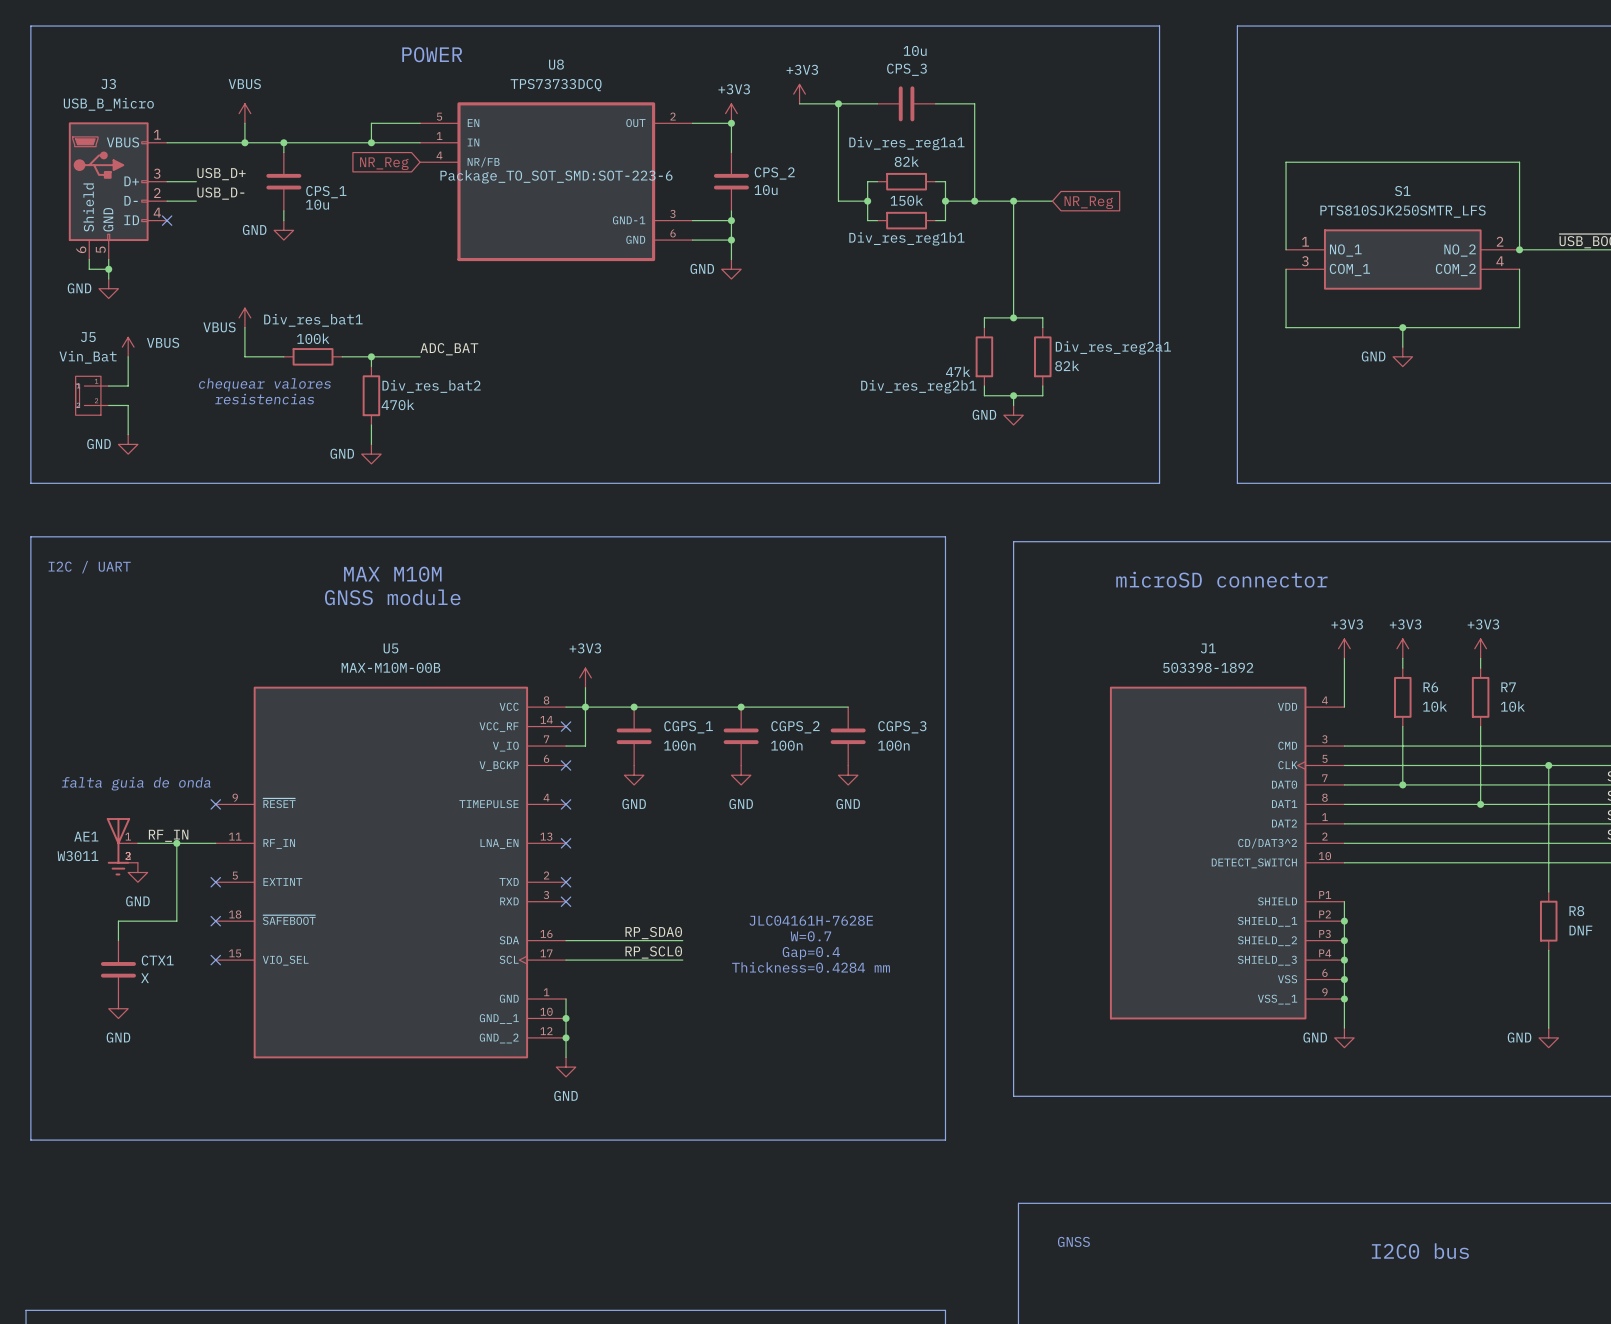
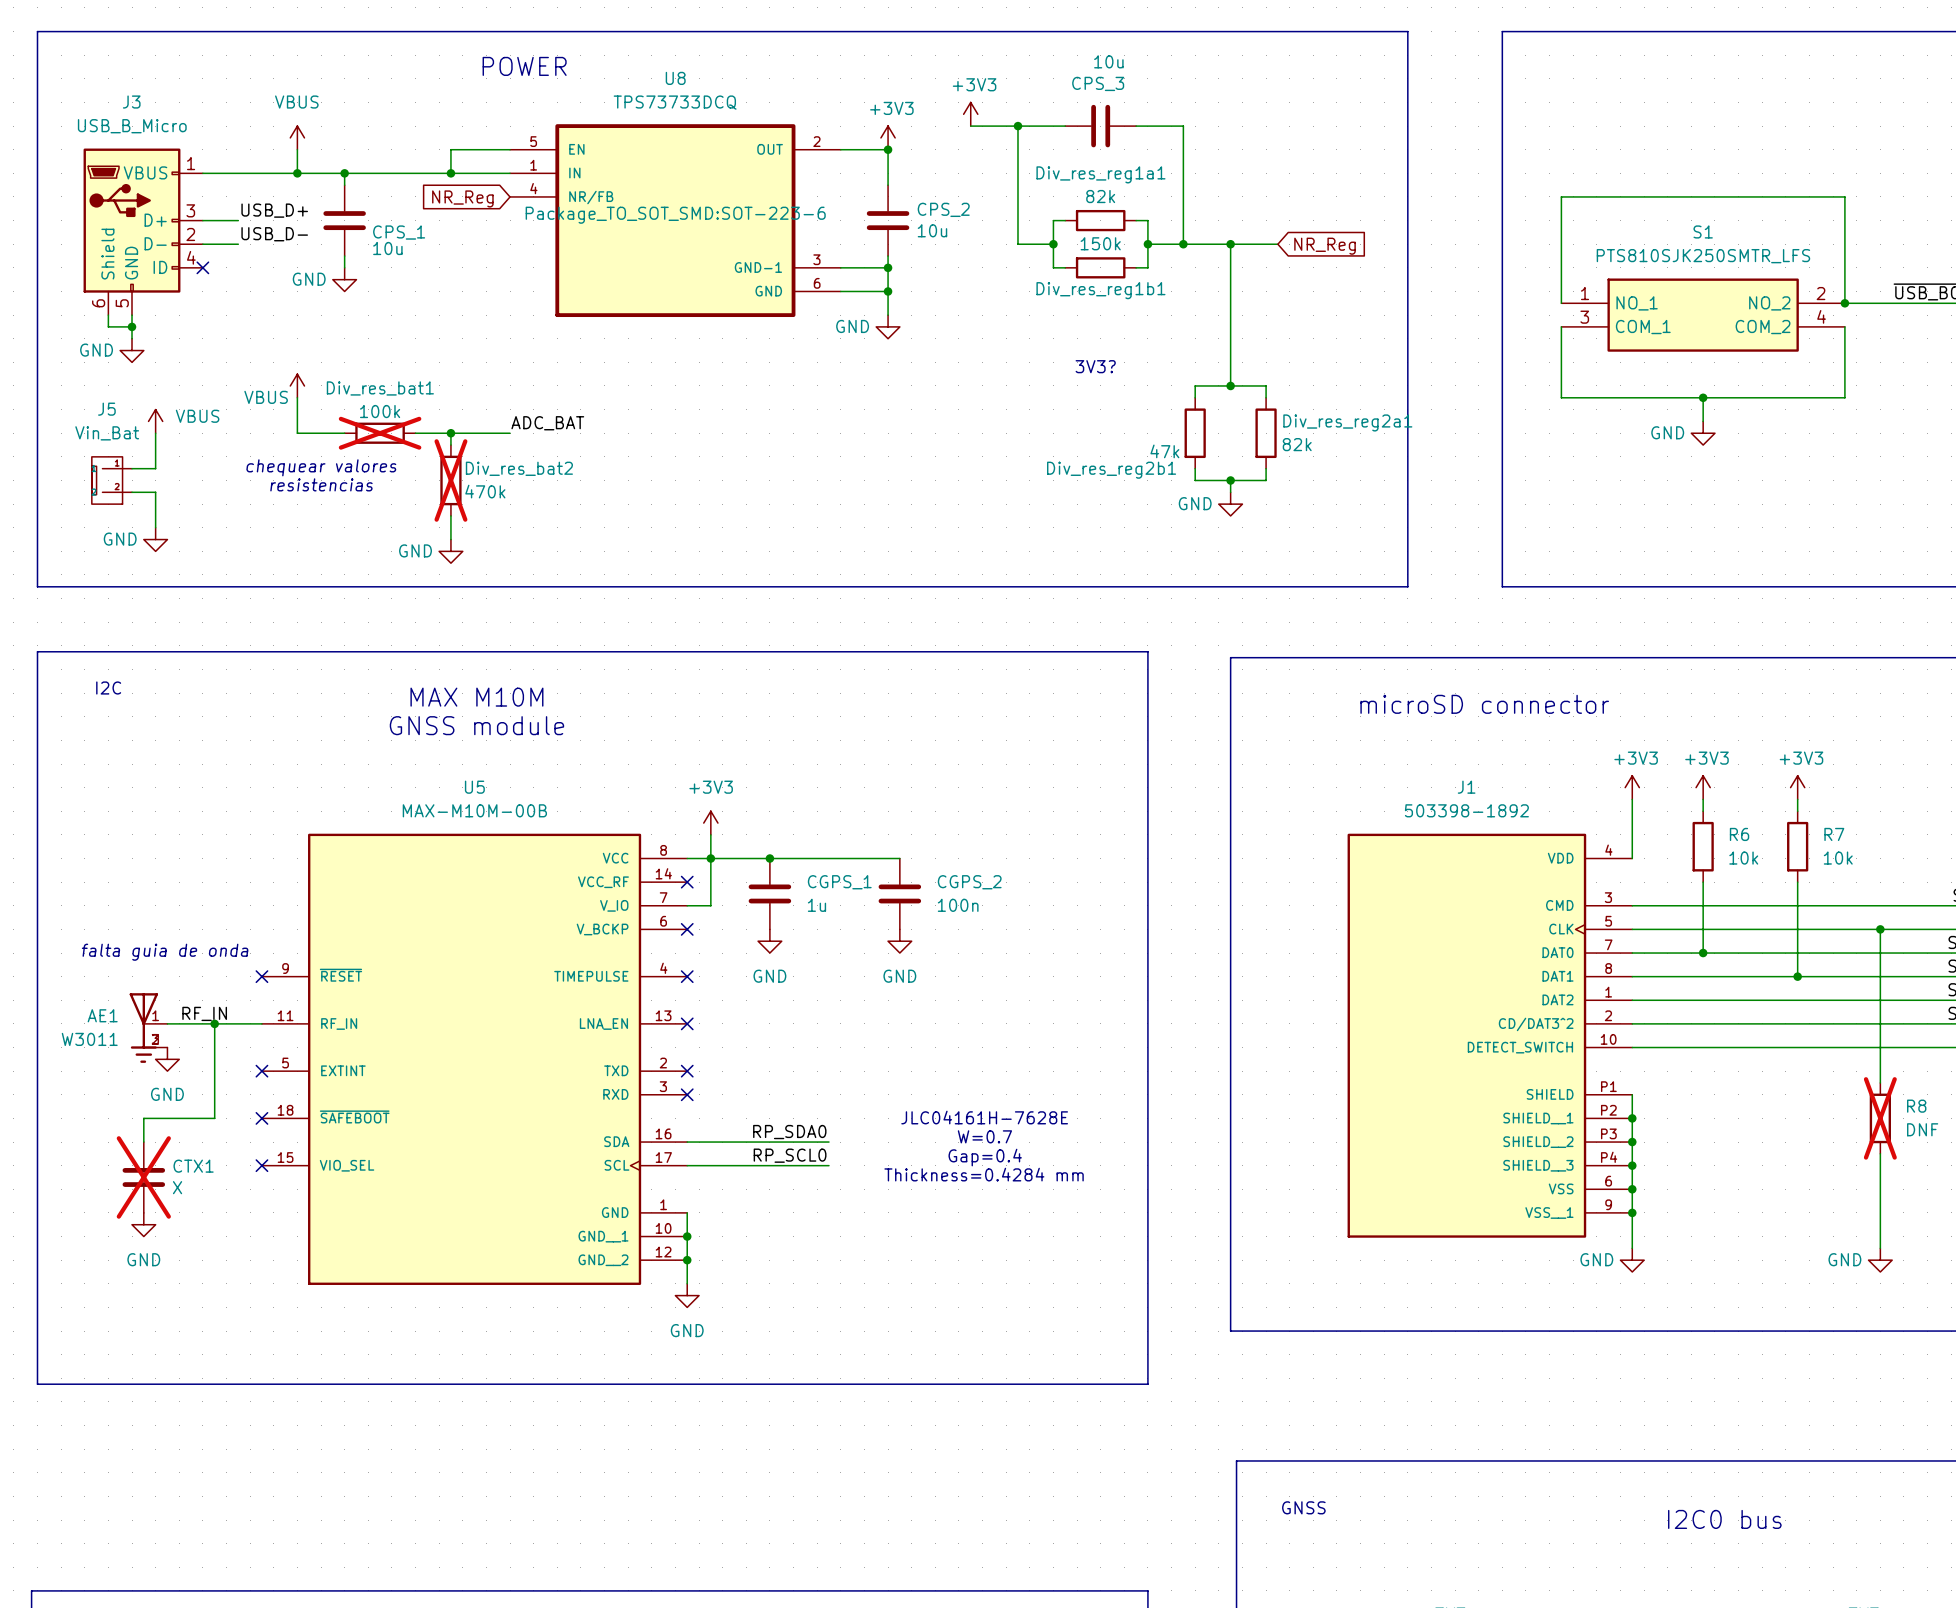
text: none -> 3V3? (1095, 366)
Div_res_bat1 do-not-place cross: none -> (380, 433)
Div_res_bat2 do-not-place cross: none -> (450, 480)
text: I2C / UART (89, 567) -> I2C (108, 688)
wire: (741, 707) (848, 707) -> none
junction: (741, 707) -> none
CGPS_3: 100n (848, 736) -> none
CGPS_1 value: 100n (679, 745) -> 1u (816, 905)
power symbol: GND (848, 775) -> none
R8 do-not-place cross: none -> (1880, 1118)
CTX1 do-not-place cross: none -> (143, 1177)

